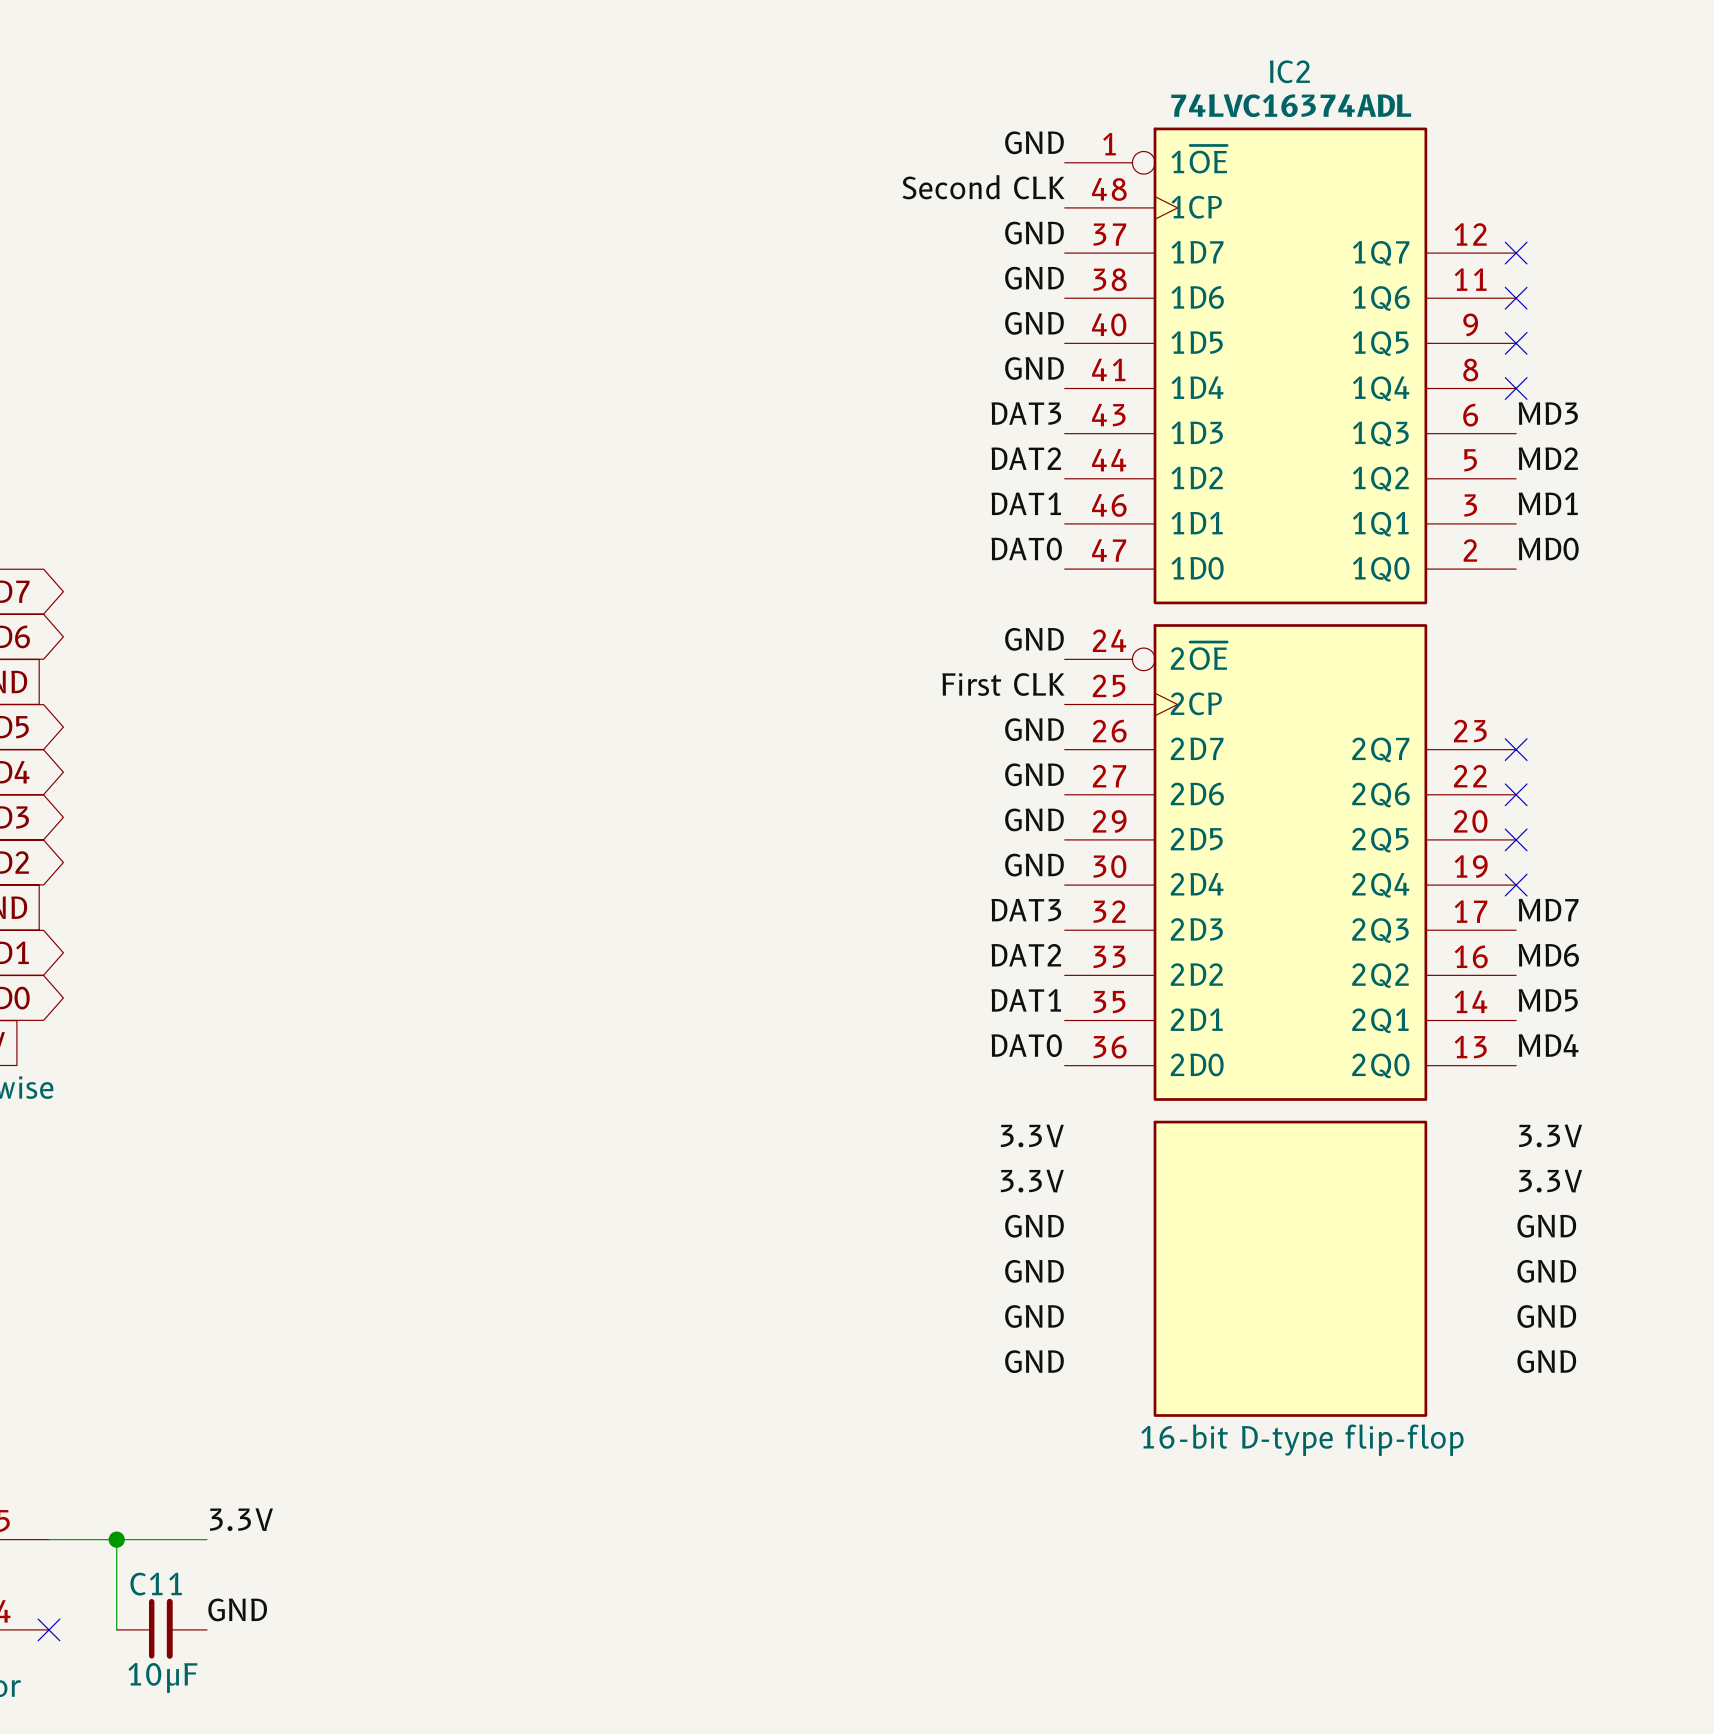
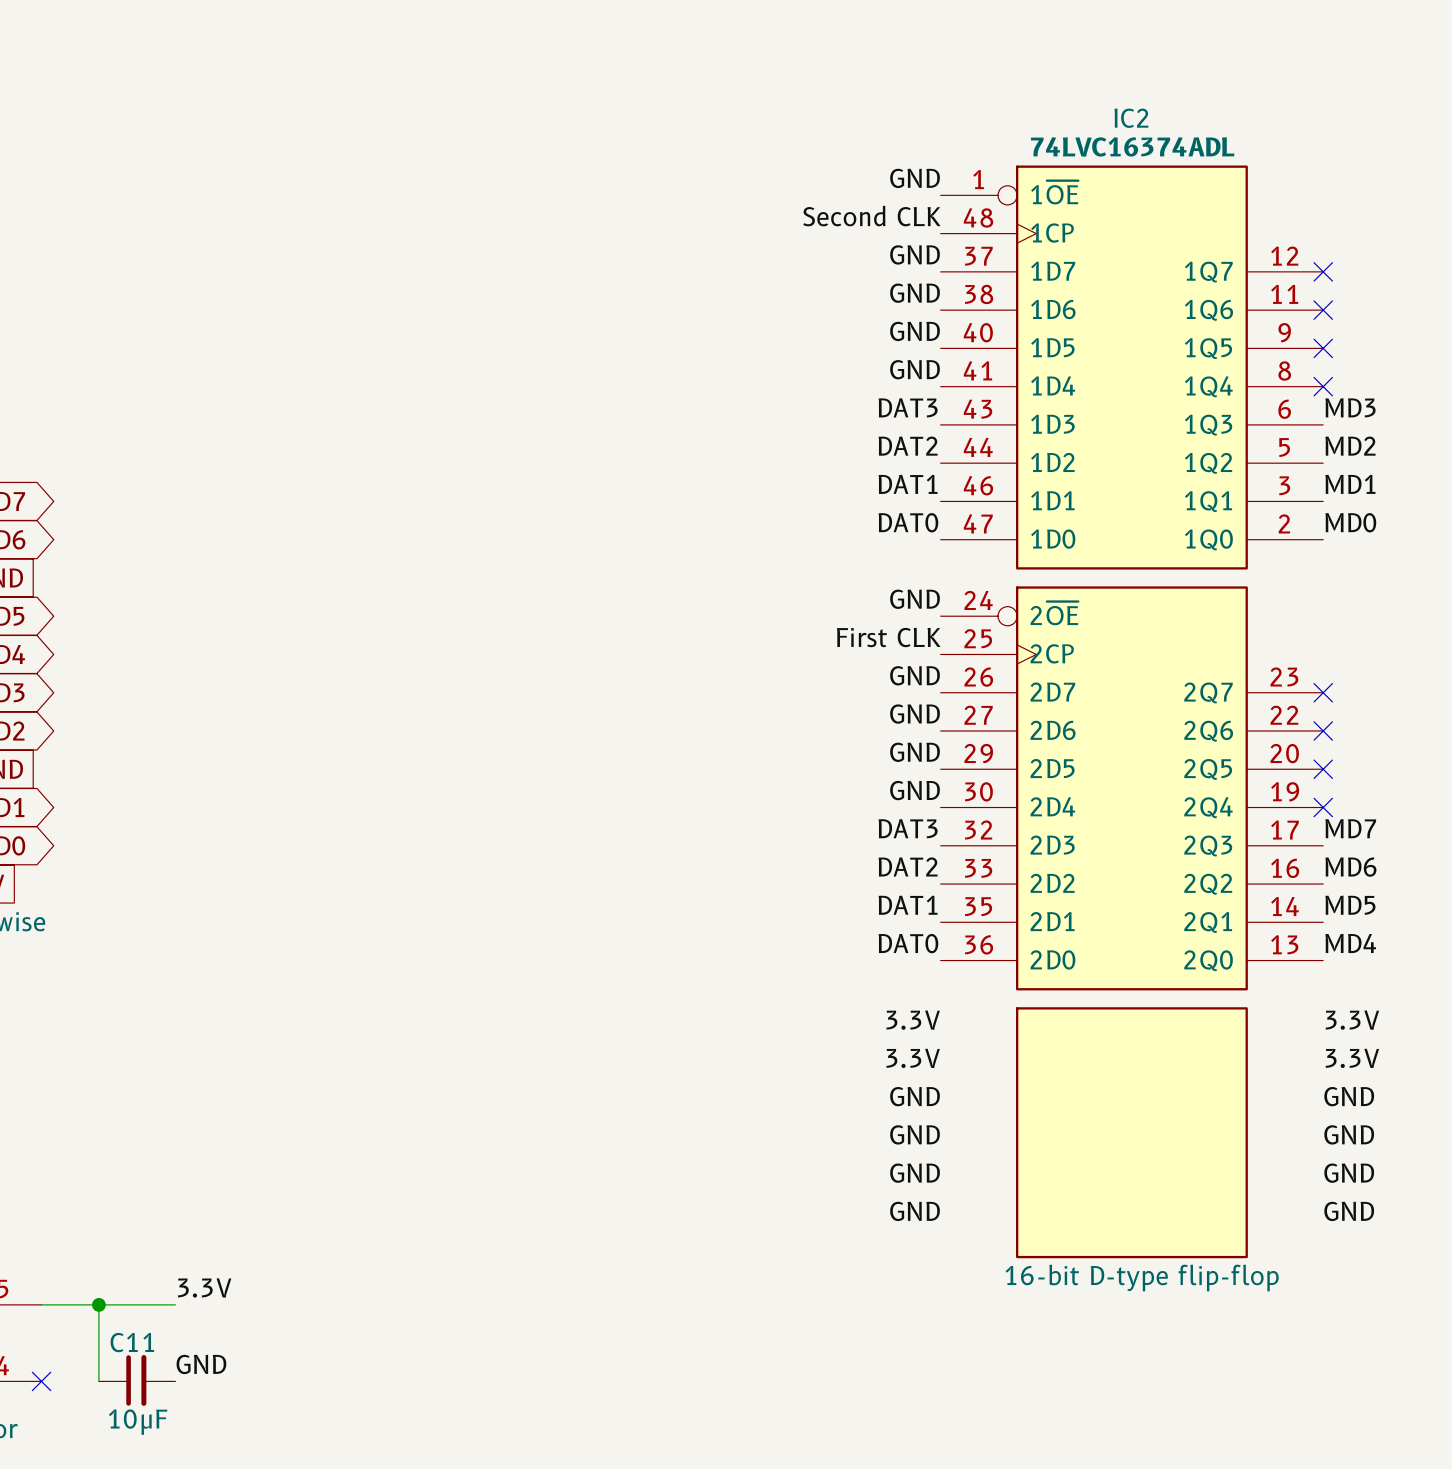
label: GND (1034, 142) -> none
label position: Second CLK (983, 187) -> Second CLK (871, 216)
label position: GND (1034, 233) -> GND (915, 178)
no-connect mark: (1516, 253) -> none
label: GND (1034, 278) -> none
no-connect mark: (1516, 298) -> none
label: none -> GND (915, 254)
no-connect mark: none -> (1323, 271)
label: GND (1034, 323) -> none
no-connect mark: (1516, 343) -> none
label: none -> GND (915, 293)
no-connect mark: none -> (1323, 310)
label: GND (1034, 368) -> none
no-connect mark: (1516, 388) -> none
label: none -> GND (915, 331)
no-connect mark: none -> (1323, 348)
label position: DAT3 (1026, 413) -> DAT3 (908, 407)
label position: MD3 (1548, 413) -> MD3 (1350, 407)
label: none -> GND (915, 369)
no-connect mark: none -> (1323, 386)
label position: DAT2 (1026, 458) -> DAT2 (908, 446)
label position: MD2 (1548, 458) -> MD2 (1350, 446)
label position: DAT1 (1026, 503) -> DAT1 (908, 484)
label position: MD1 (1548, 503) -> MD1 (1350, 484)
label position: DAT0 (1026, 549) -> DAT0 (908, 522)
label position: MD0 (1548, 549) -> MD0 (1350, 522)
label: GND (1034, 639) -> none
label position: First CLK (1003, 684) -> First CLK (888, 637)
label position: GND (1034, 729) -> GND (915, 599)
no-connect mark: (1516, 749) -> none
IC2 position: (1290, 772) -> (1131, 711)
label: GND (1034, 774) -> none
no-connect mark: (1516, 794) -> none
label: none -> GND (915, 675)
no-connect mark: none -> (1323, 692)
label: GND (1034, 819) -> none
no-connect mark: (1516, 839) -> none
label: none -> GND (915, 714)
no-connect mark: none -> (1323, 730)
label: GND (1034, 865) -> none
no-connect mark: (1516, 885) -> none
label: none -> GND (915, 752)
no-connect mark: none -> (1323, 769)
label position: DAT3 (1026, 910) -> DAT3 (908, 828)
label position: MD7 (1548, 910) -> MD7 (1350, 828)
label: none -> GND (915, 790)
no-connect mark: none -> (1323, 807)
label position: DAT2 (1026, 955) -> DAT2 (908, 866)
label position: MD6 (1548, 955) -> MD6 (1350, 867)
label position: DAT1 (1026, 1000) -> DAT1 (908, 905)
label position: MD5 (1548, 1000) -> MD5 (1350, 905)
label position: DAT0 (1026, 1045) -> DAT0 (908, 943)
label position: MD4 (1548, 1045) -> MD4 (1350, 943)
label: 3.3V (1032, 1135) -> none
label: 3.3V (1550, 1135) -> none
label position: 3.3V (1032, 1181) -> 3.3V (913, 1020)
label position: 3.3V (1550, 1181) -> 3.3V (1352, 1020)
label: GND (1034, 1226) -> none
label: GND (1546, 1226) -> none
label: none -> 3.3V (913, 1058)
label: none -> 3.3V (1352, 1058)
label: GND (1034, 1271) -> none
label: GND (1546, 1271) -> none
label: none -> GND (915, 1096)
label: none -> GND (1349, 1096)
label: GND (1034, 1316) -> none
label: GND (1546, 1316) -> none
label: none -> GND (915, 1134)
label: none -> GND (1349, 1134)
label: GND (1034, 1361) -> none
label: GND (1546, 1361) -> none
label: none -> GND (915, 1173)
label: none -> GND (1349, 1173)
label: none -> GND (915, 1211)
label: none -> GND (1349, 1211)

